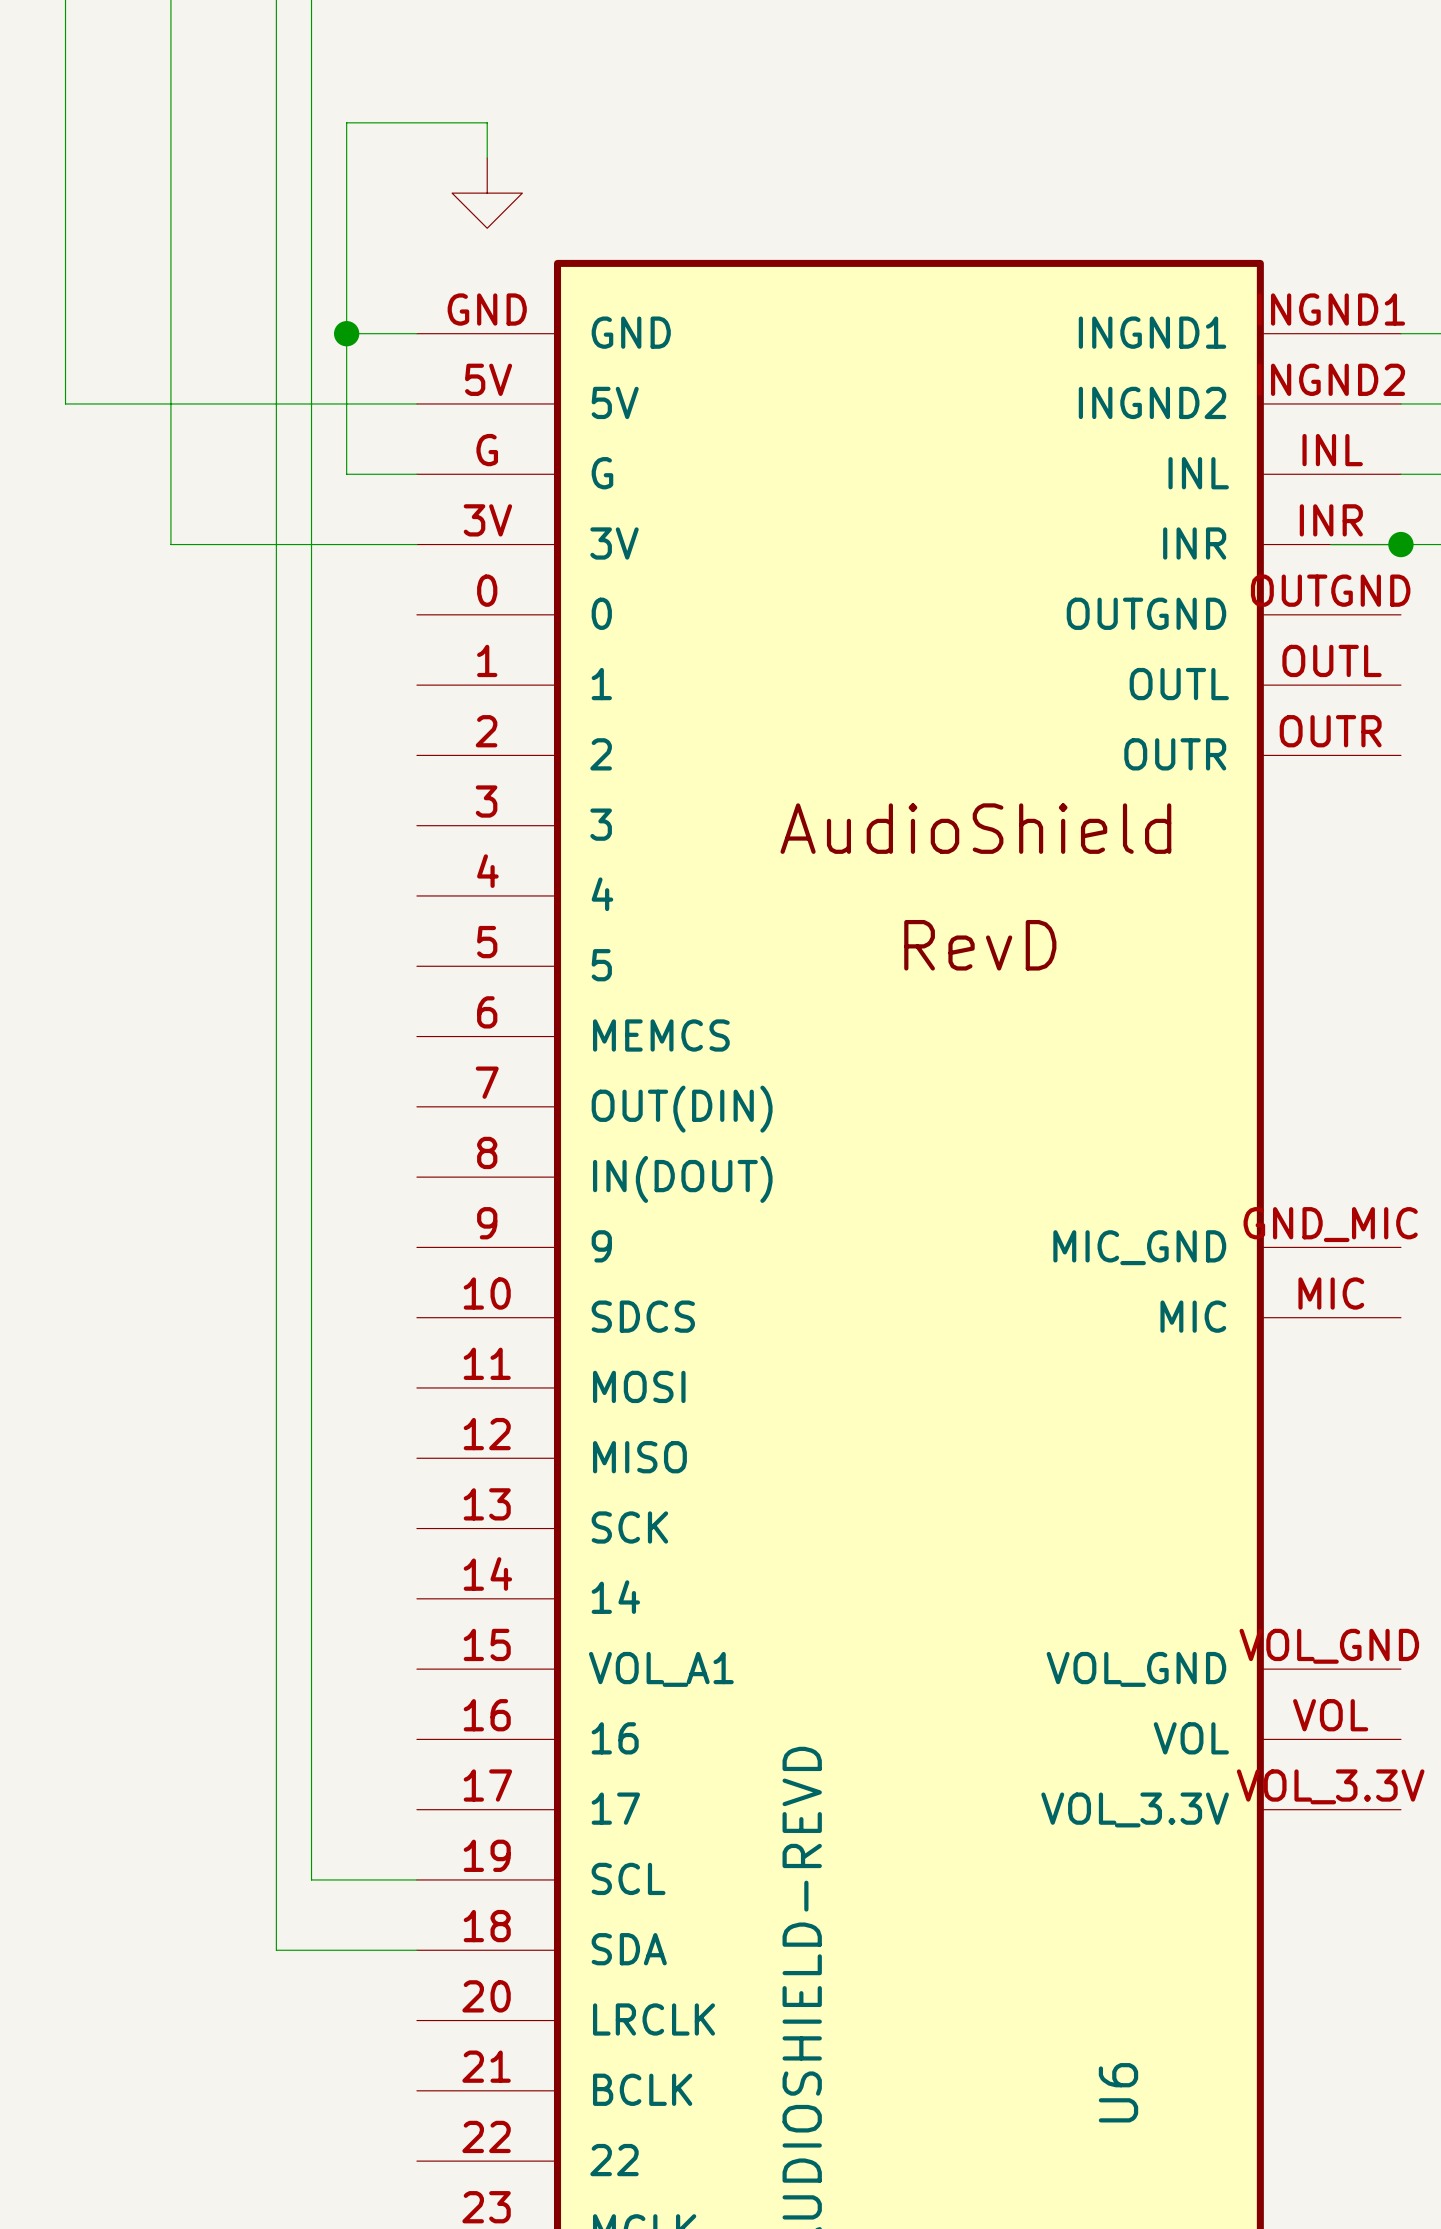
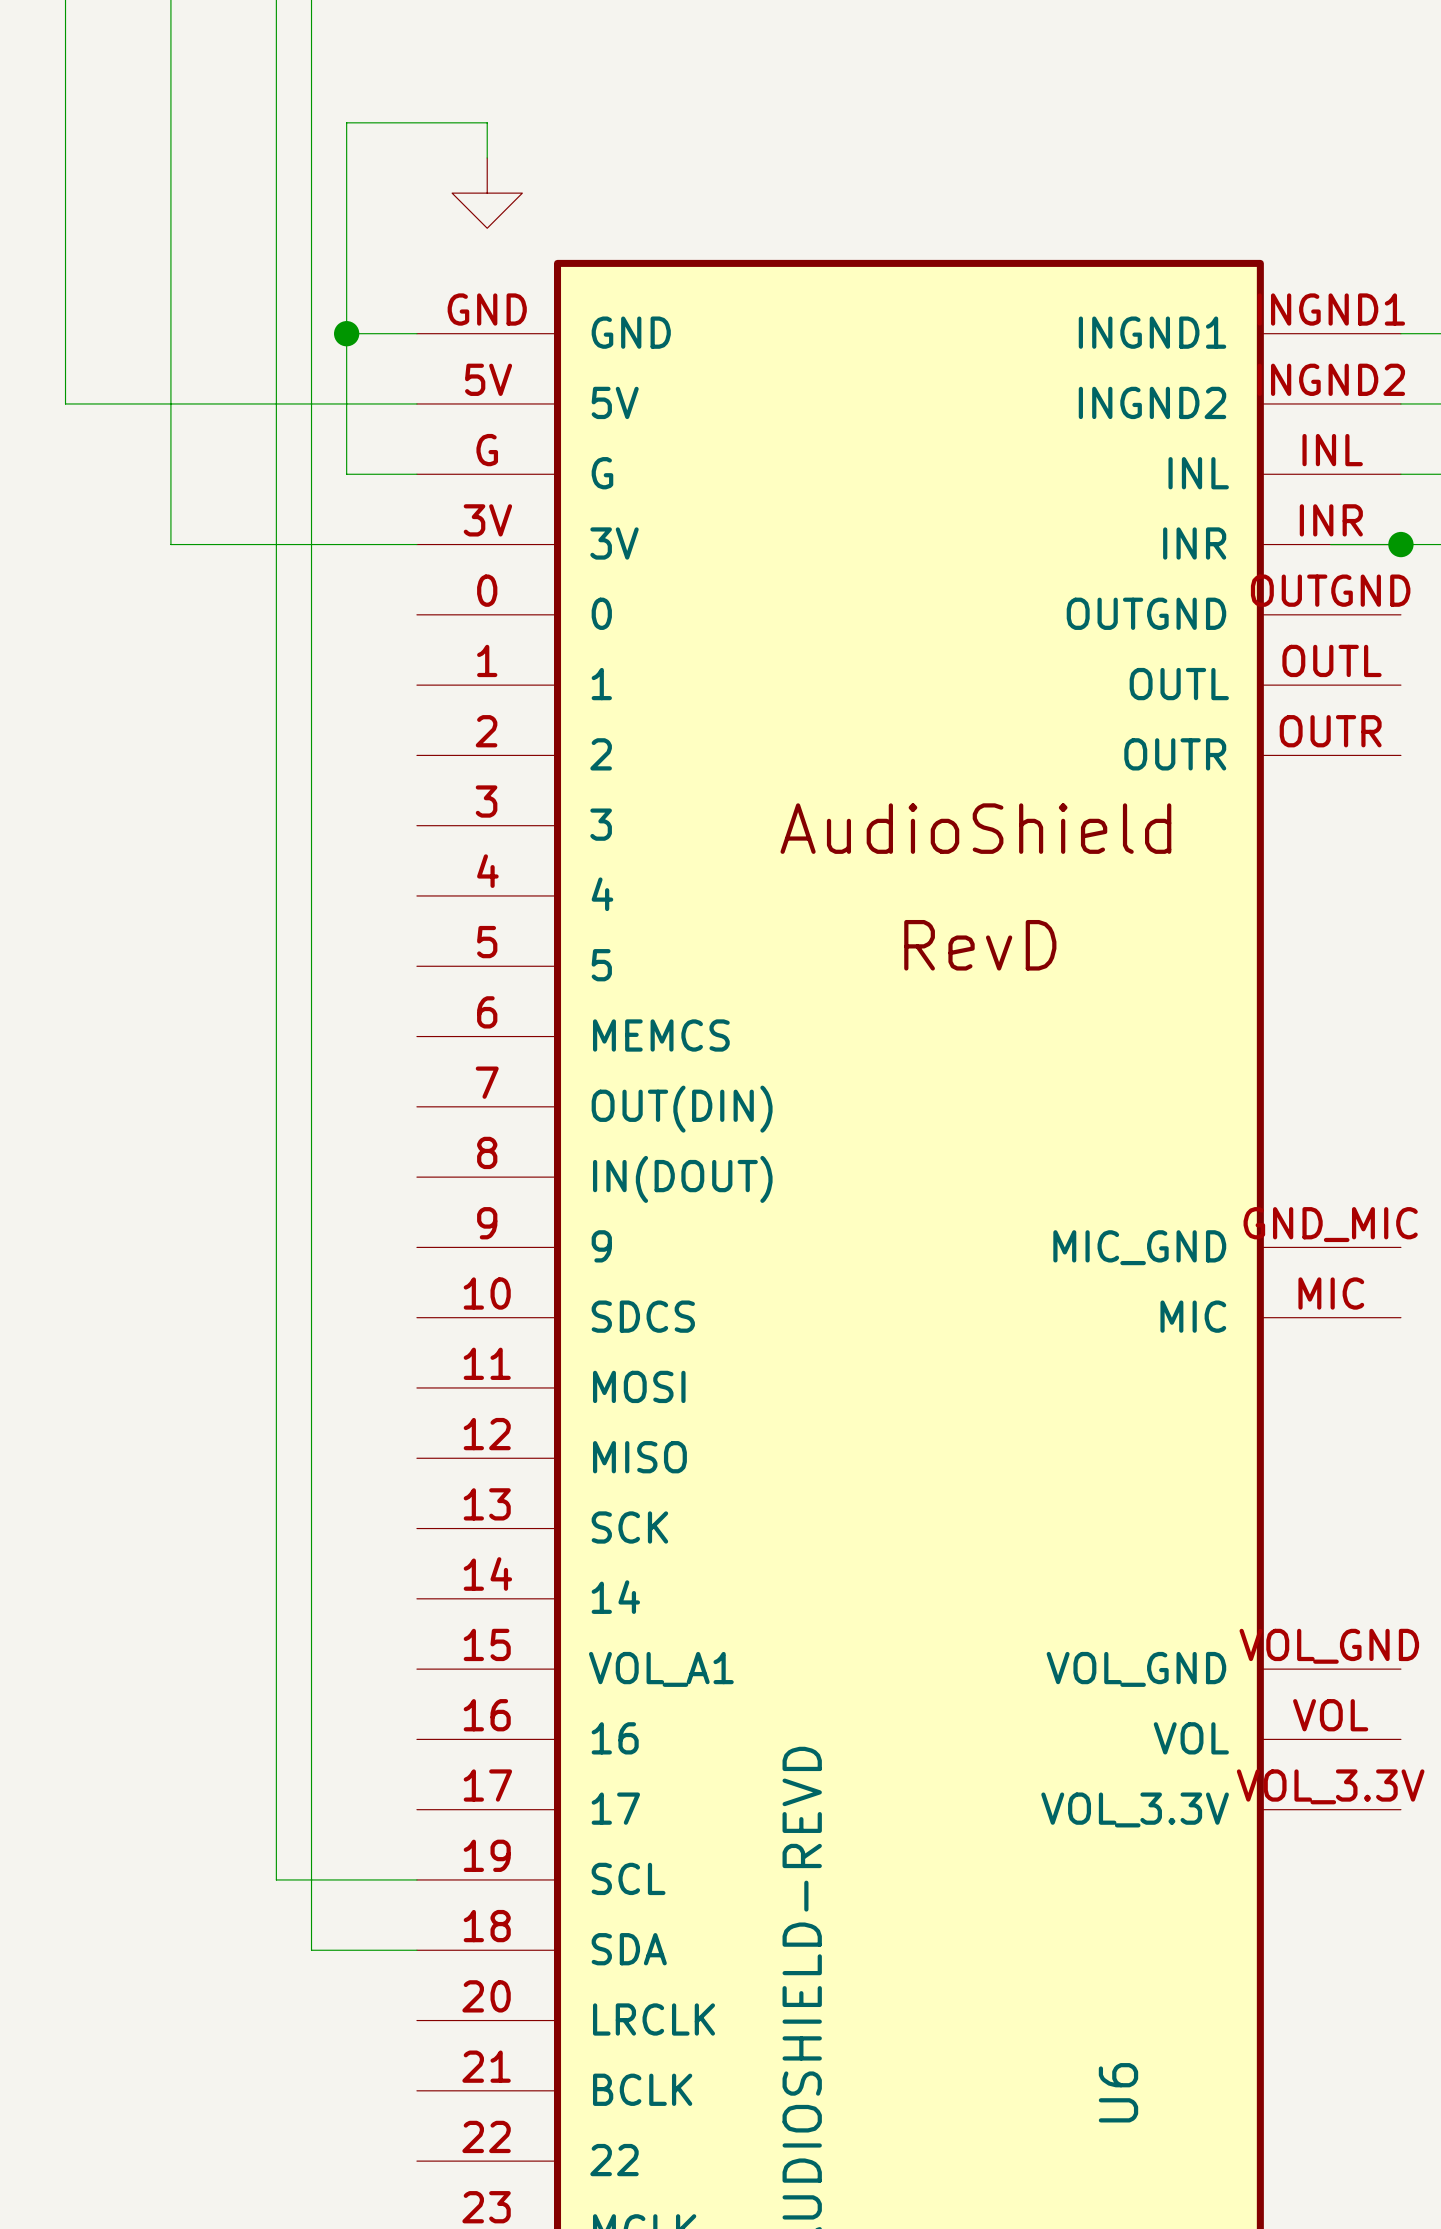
wire: (276, 1879) (276, 1950) (311, 1950) -> (276, 1879) (311, 1879) (311, 1950)

